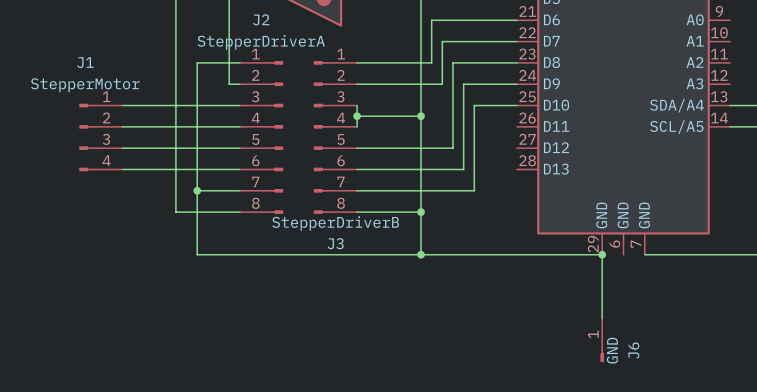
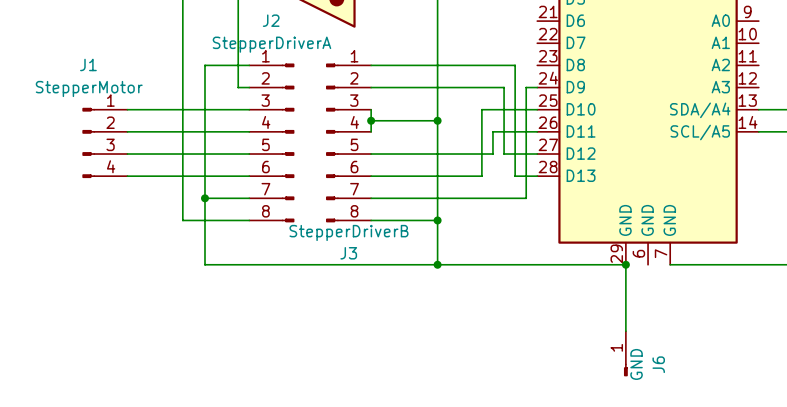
wire: (516, 20) (431, 20) (431, 62) -> (470, 65) (448, 65)
wire: (516, 41) (442, 41) (442, 84) -> (481, 87) (459, 87)
wire: (452, 62) (452, 148) -> none
wire: (495, 62) (516, 62) -> (515, 65) (515, 176) (537, 176)
wire: (463, 84) (463, 105) -> (492, 109) (481, 109)
wire: (484, 84) (506, 84) -> (504, 87) (504, 154) (537, 154)
wire: none -> (526, 87) (526, 198) (492, 198)
wire: (474, 105) (474, 126) -> (537, 131) (492, 131)
wire: (474, 148) (474, 190) -> (492, 154) (470, 154)

